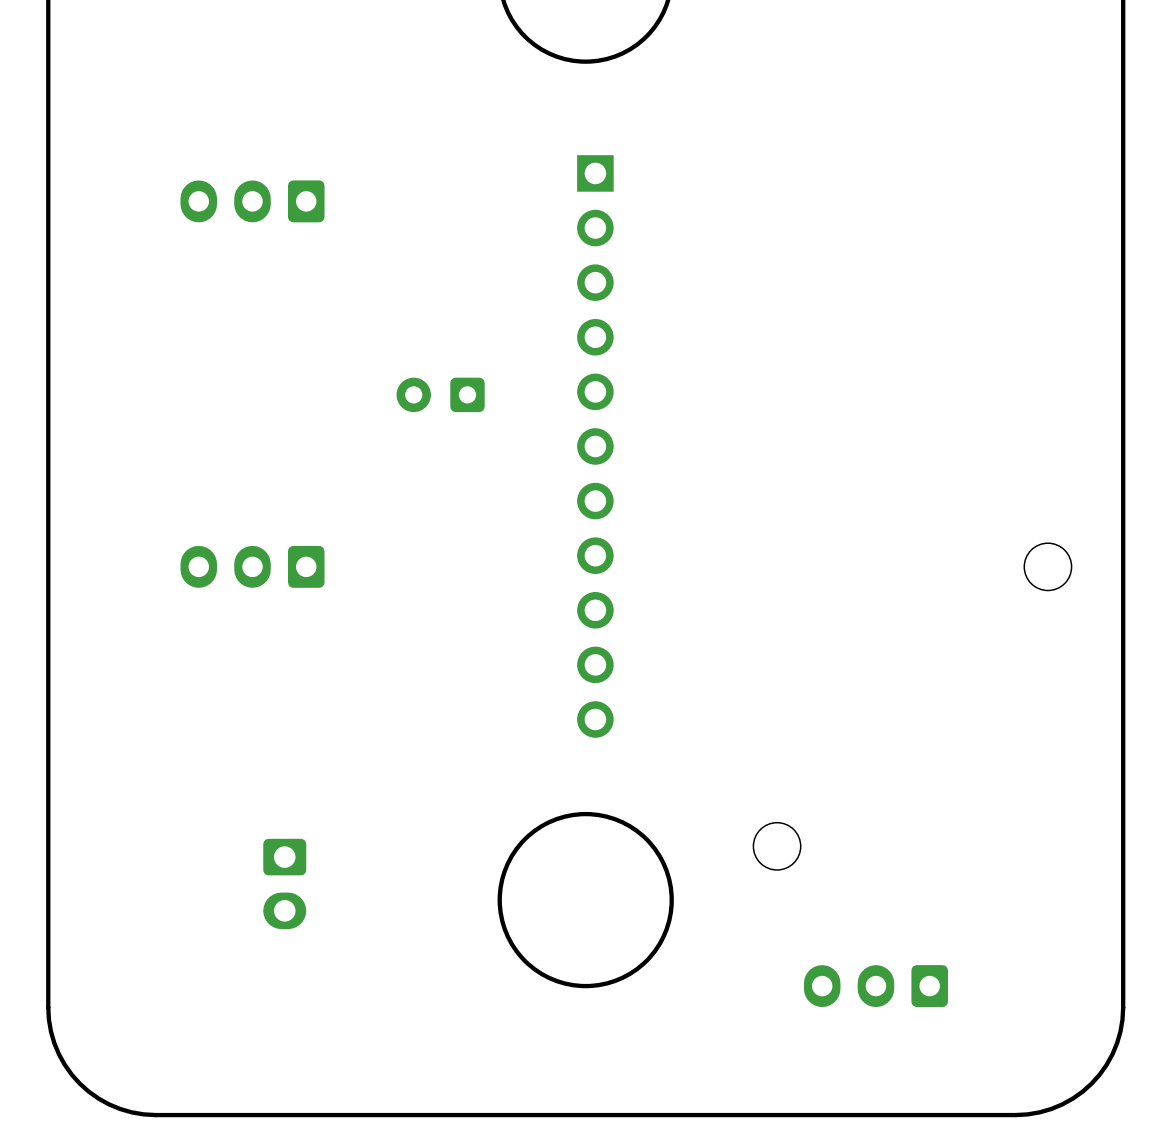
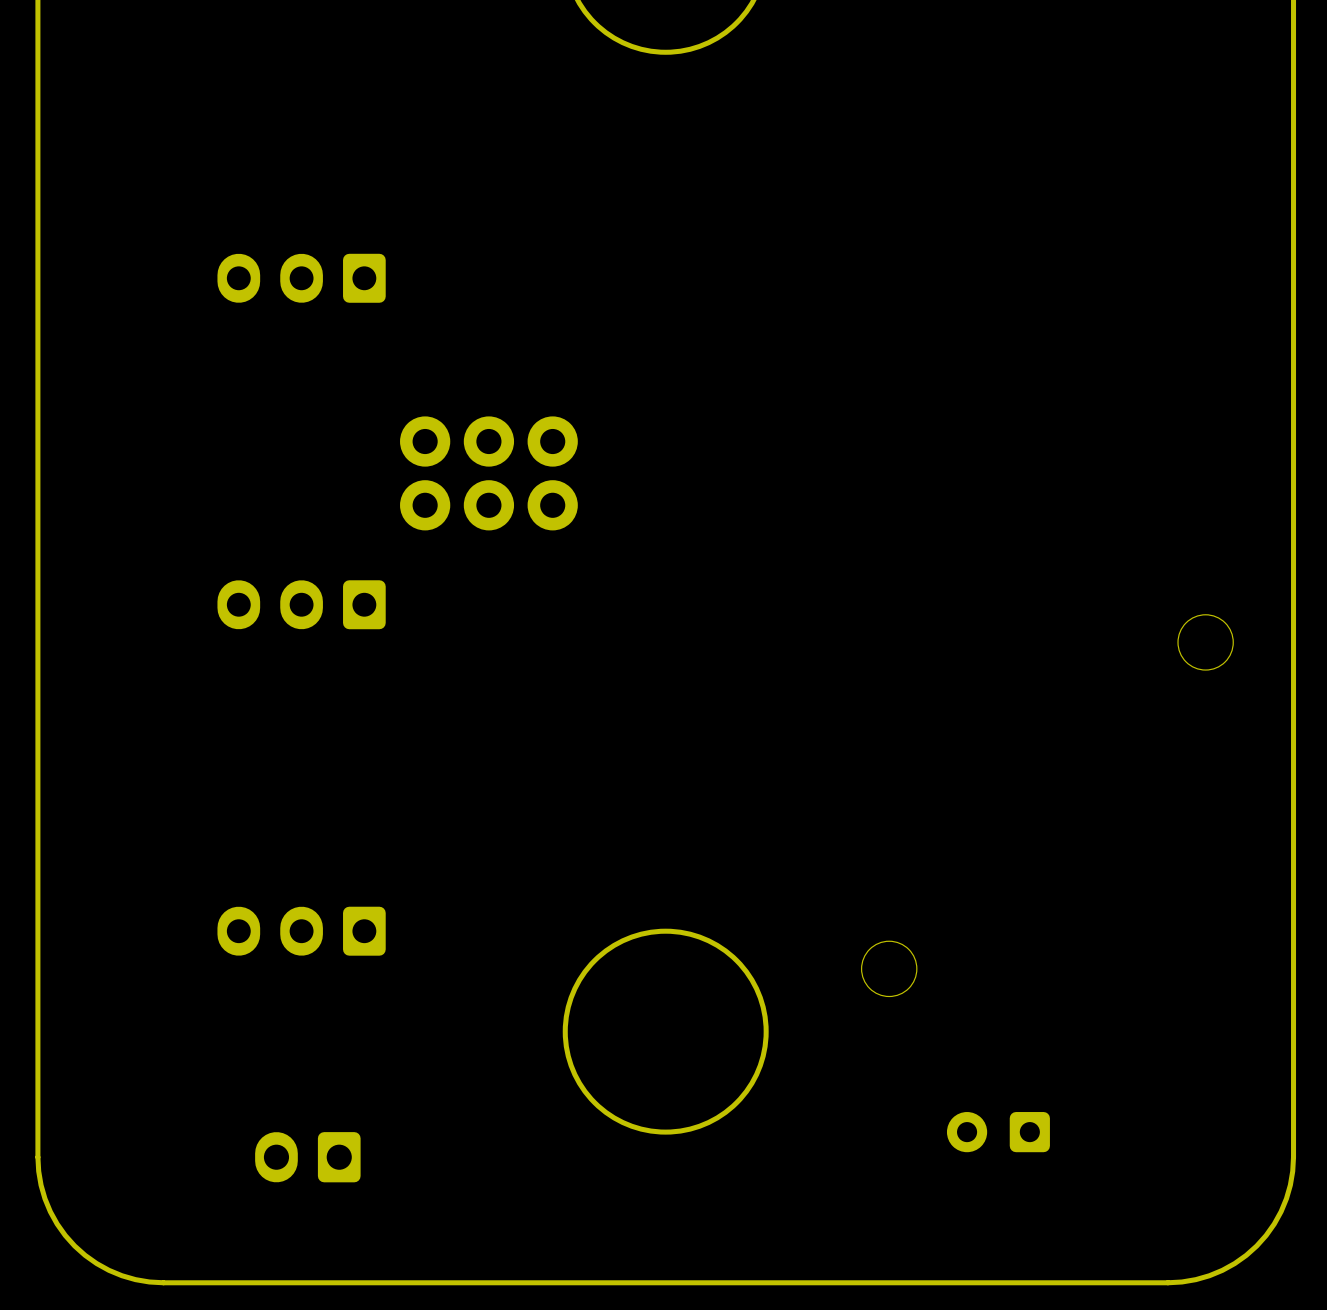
part position: (252, 201) -> (301, 278)
part: (440, 394) -> none
part: none -> (488, 473)
part: (595, 446) -> none
part position: (252, 566) -> (301, 604)
part: none -> (301, 931)
part rotation: 0° (284, 883) -> 90° clockwise (307, 1157)
part position: (284, 883) -> (307, 1157)
part footprint: [803, 965, 948, 1008] -> [946, 1112, 1050, 1153]

